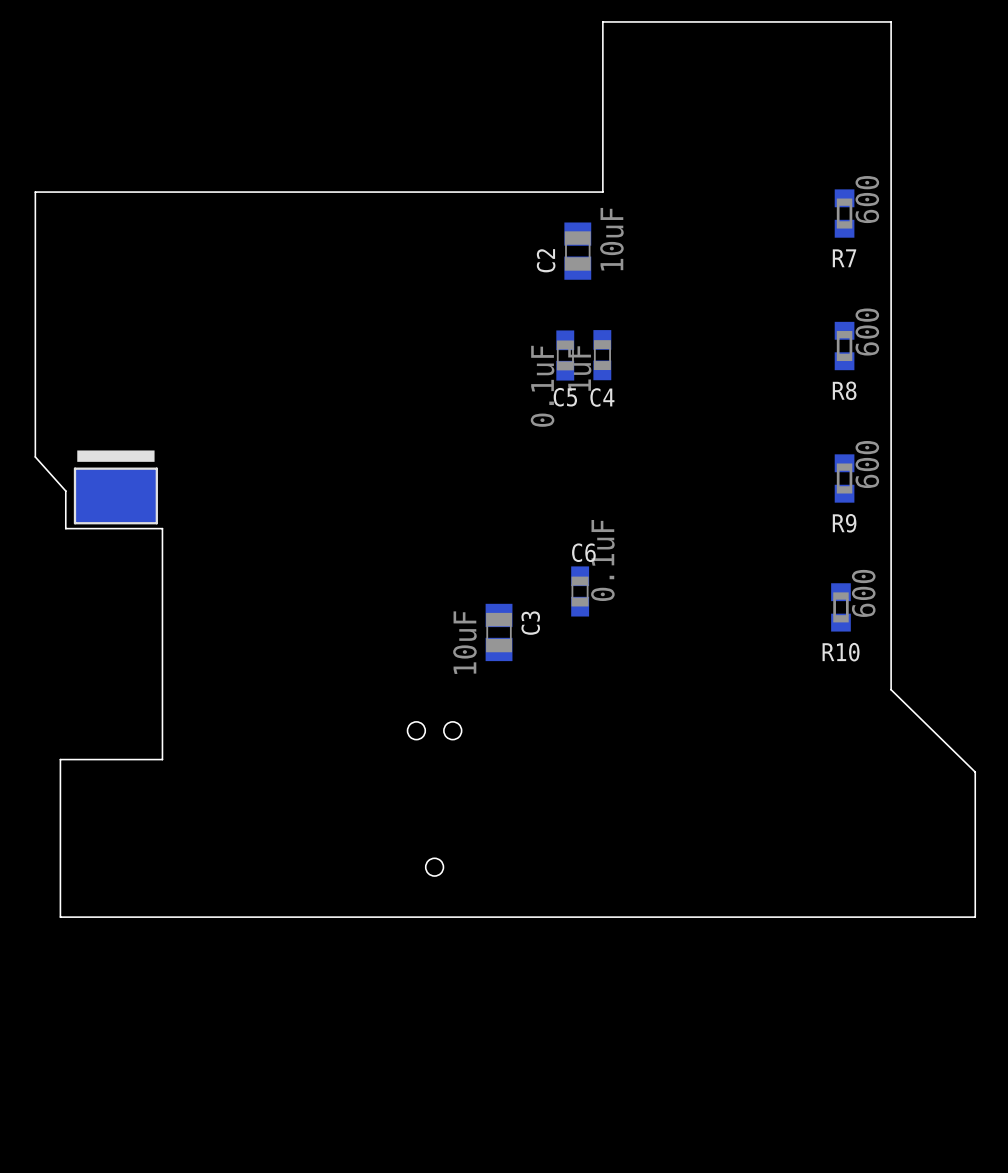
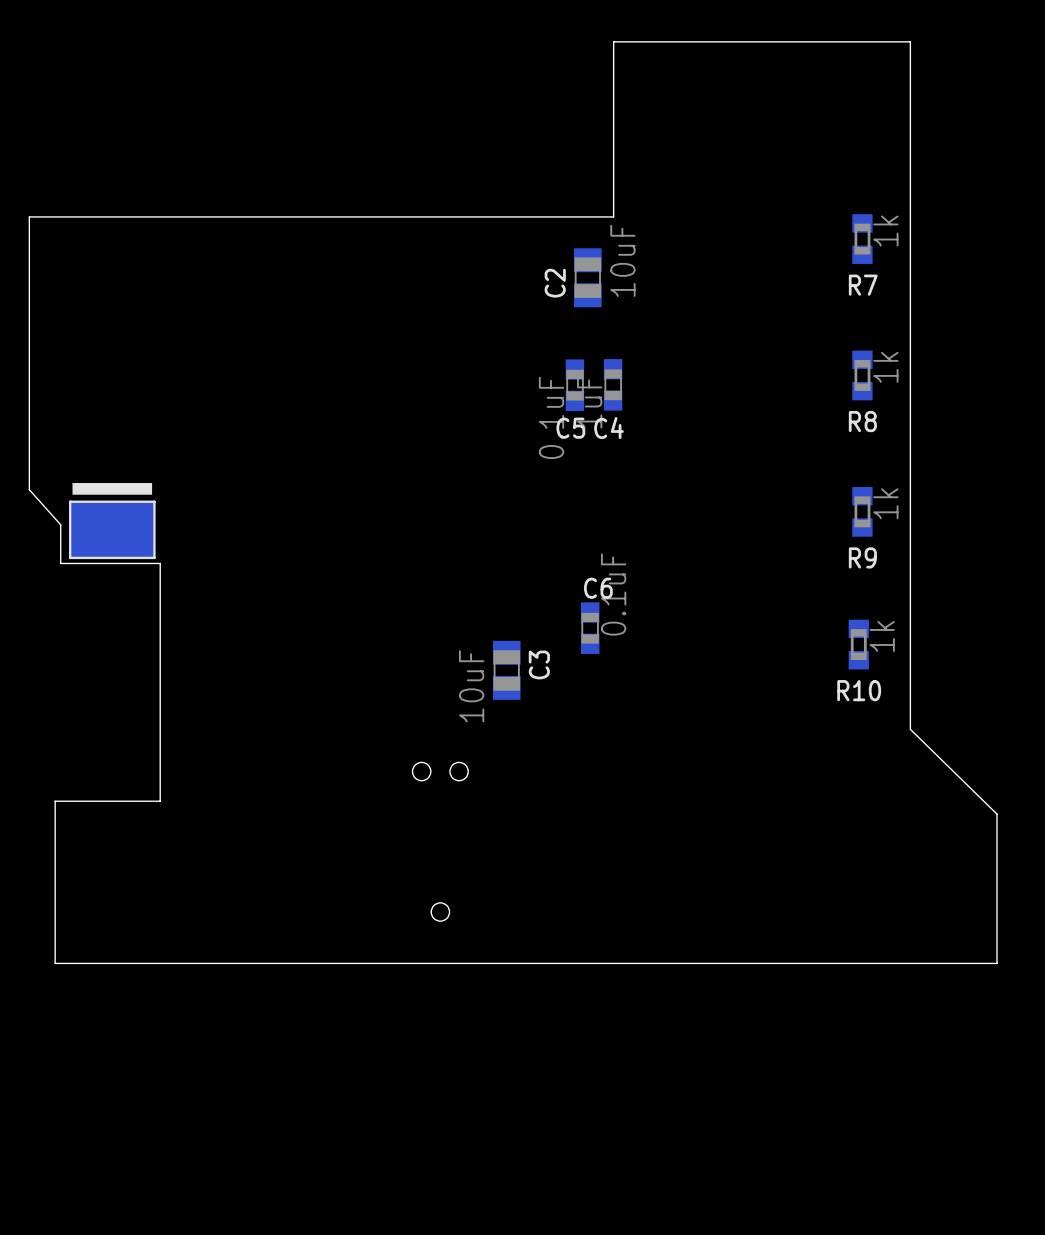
R7 value: 600 (867, 199) -> 1k (885, 230)
R8 value: 600 (867, 332) -> 1k (885, 367)
R9 value: 600 (867, 464) -> 1k (885, 503)
R10 value: 600 (863, 593) -> 1k (882, 636)

